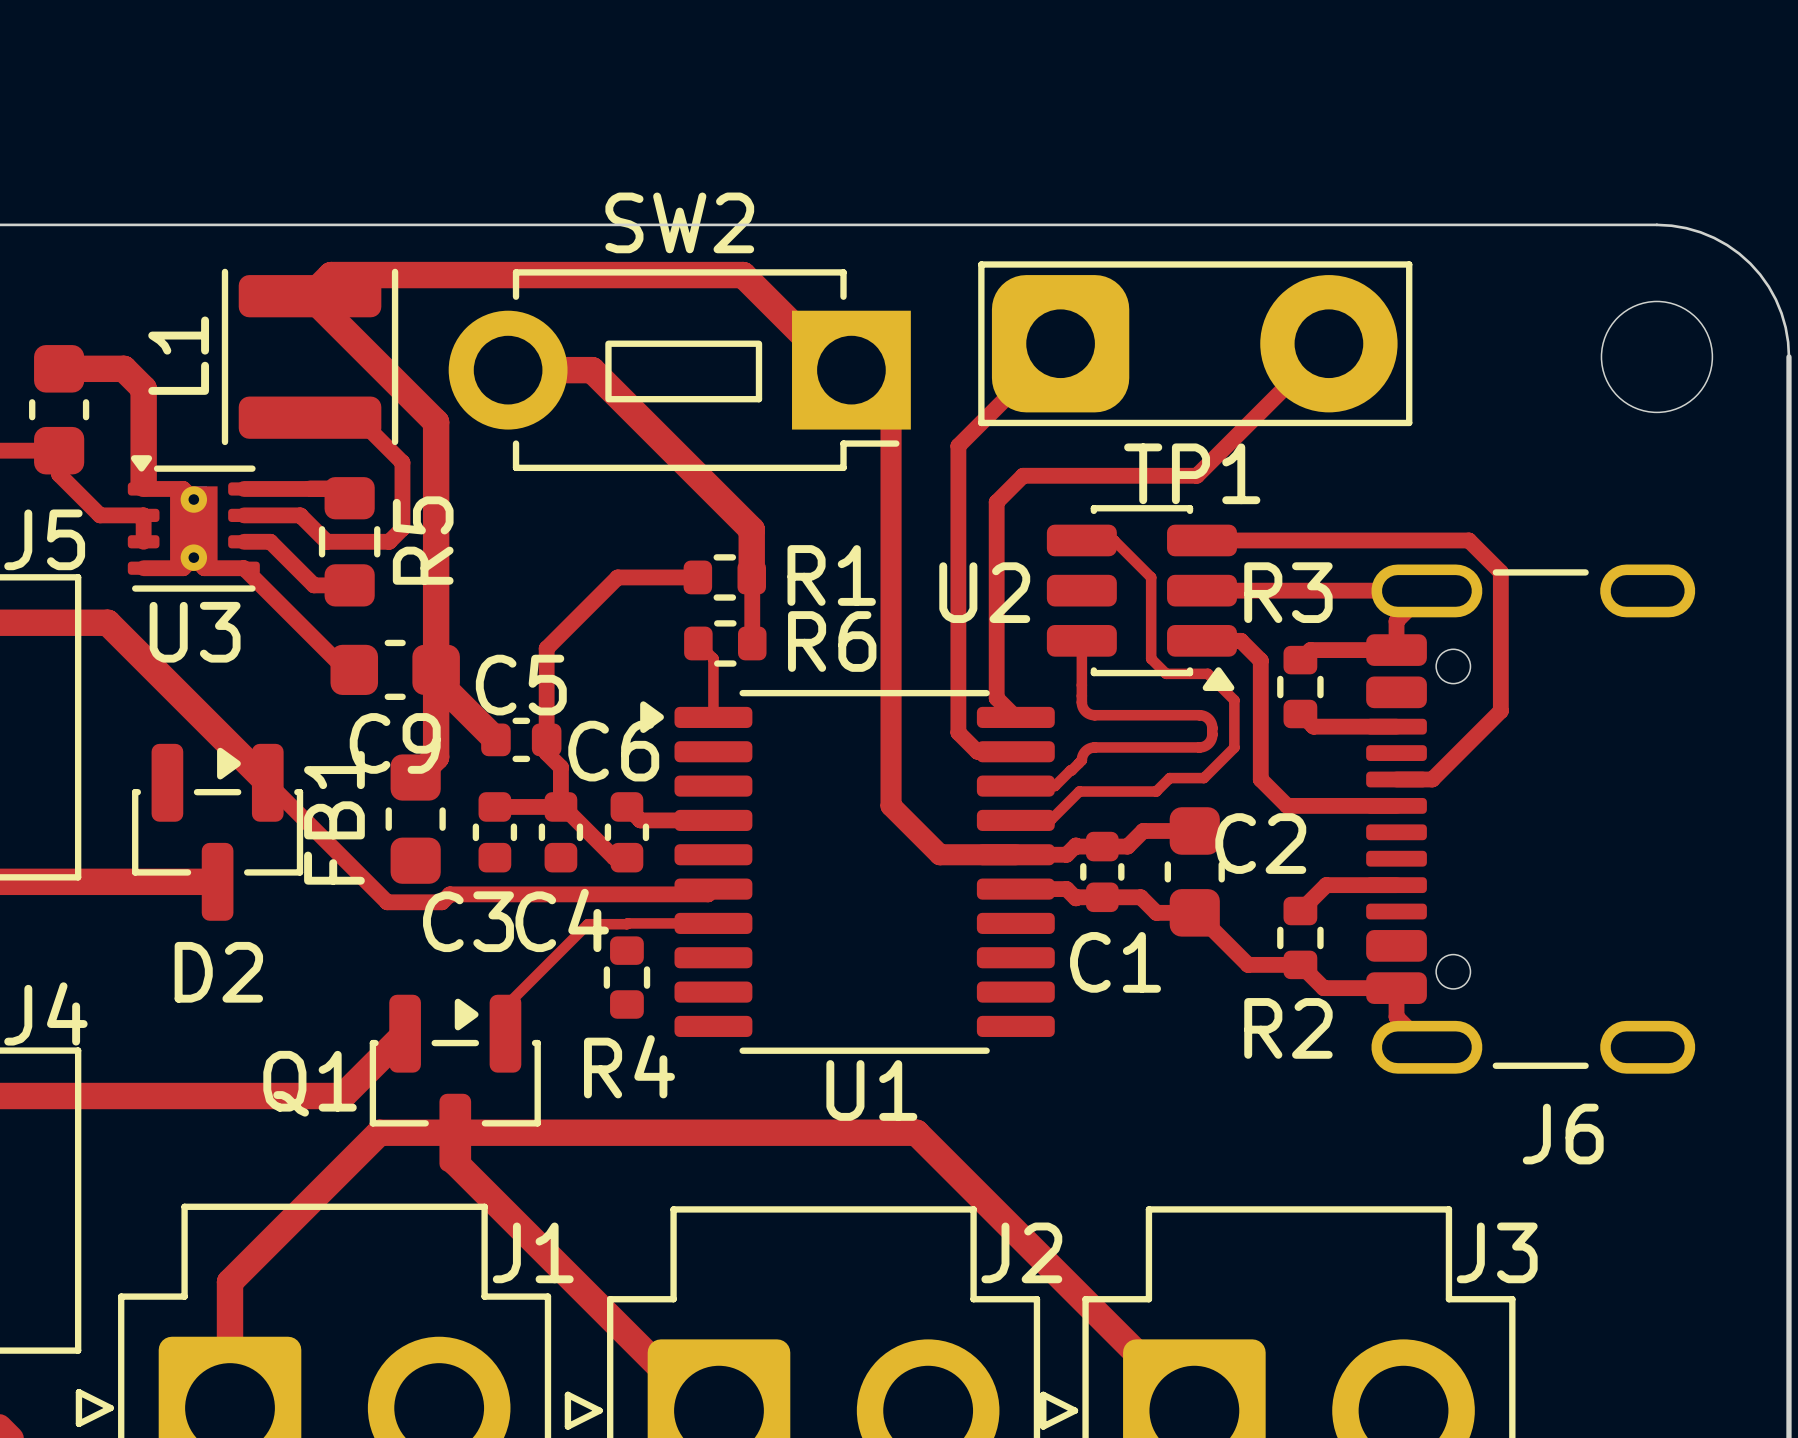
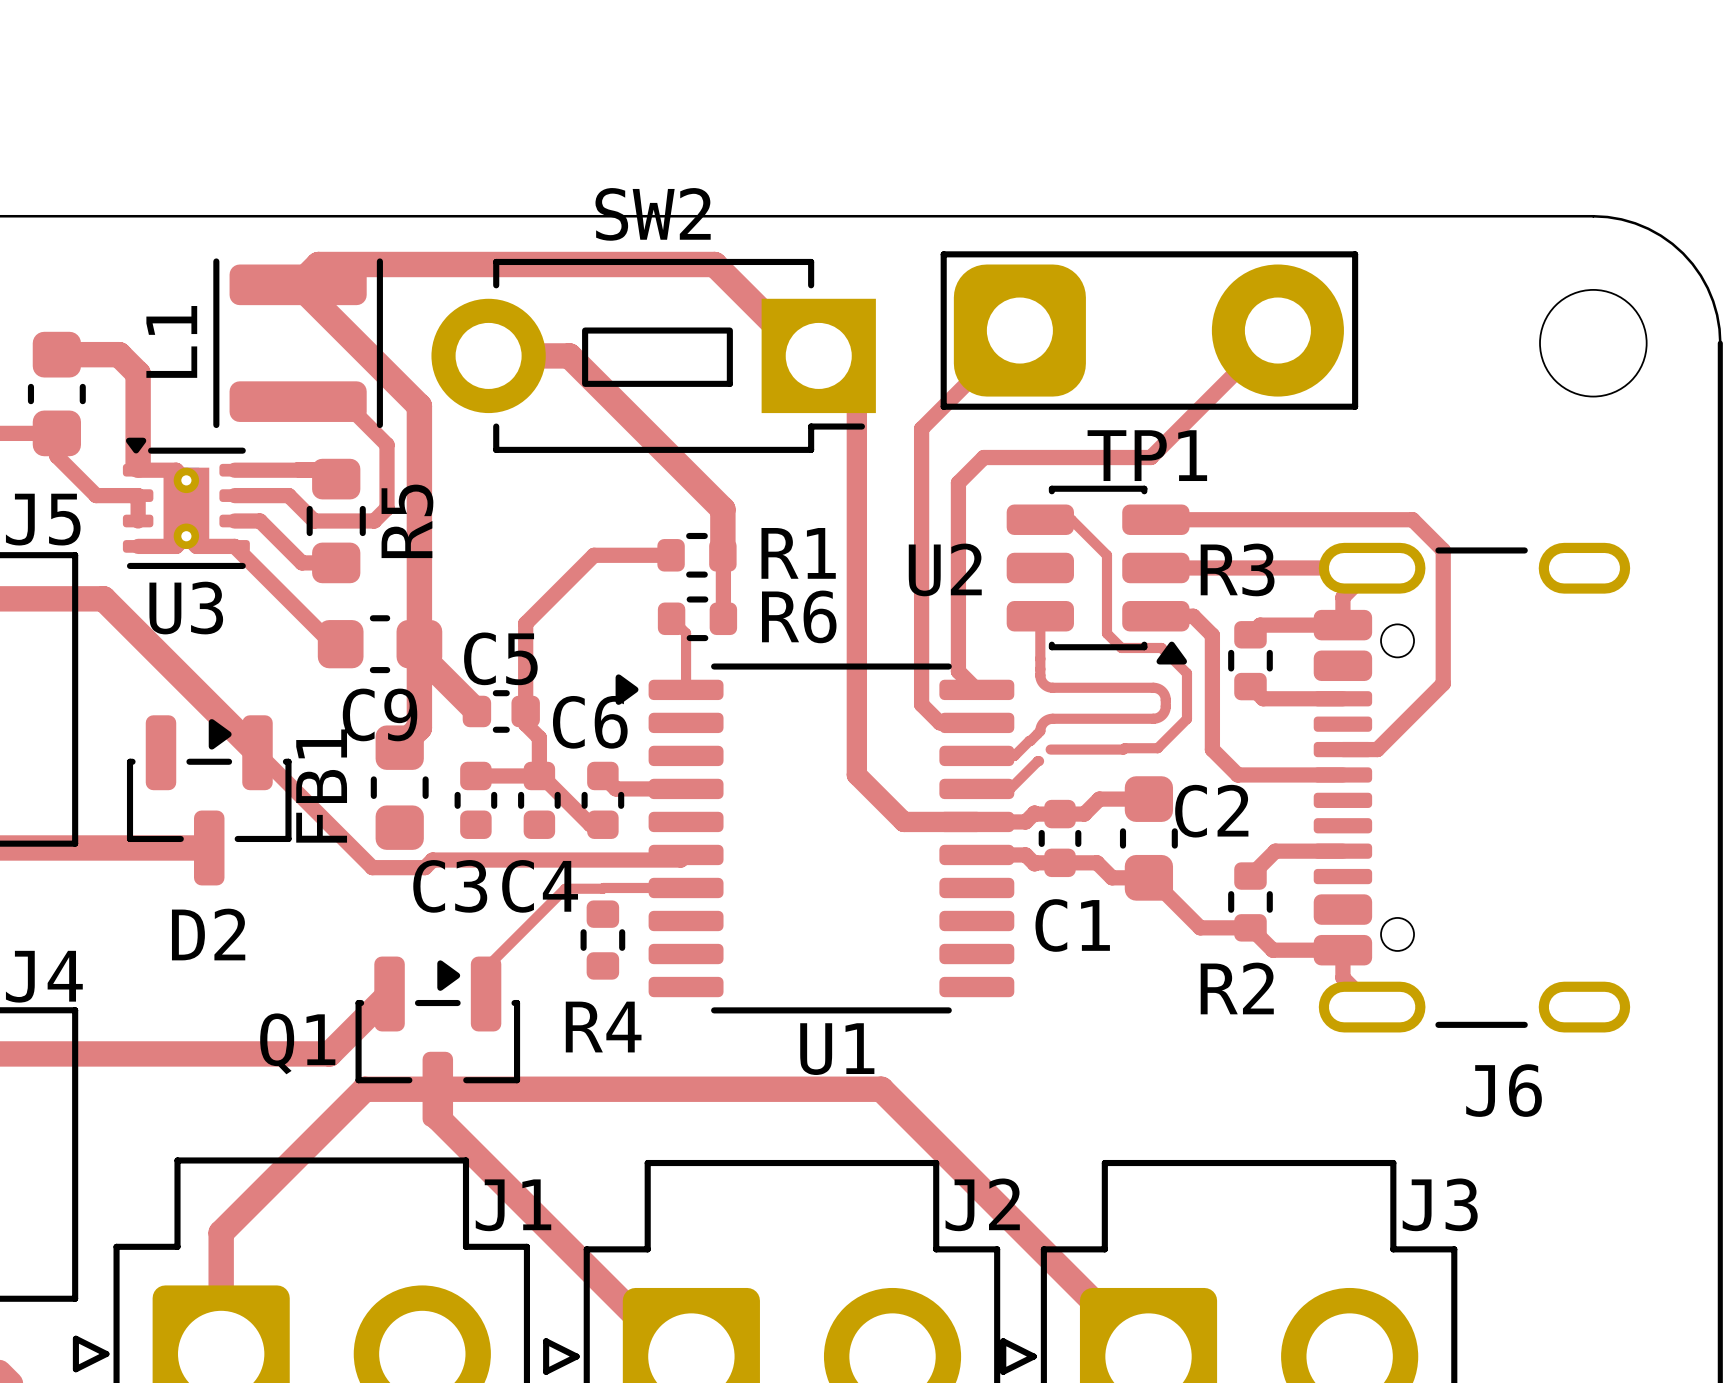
top track: (1168, 779) (1156, 791) (1080, 791) -> (1123, 749) (1050, 749)

